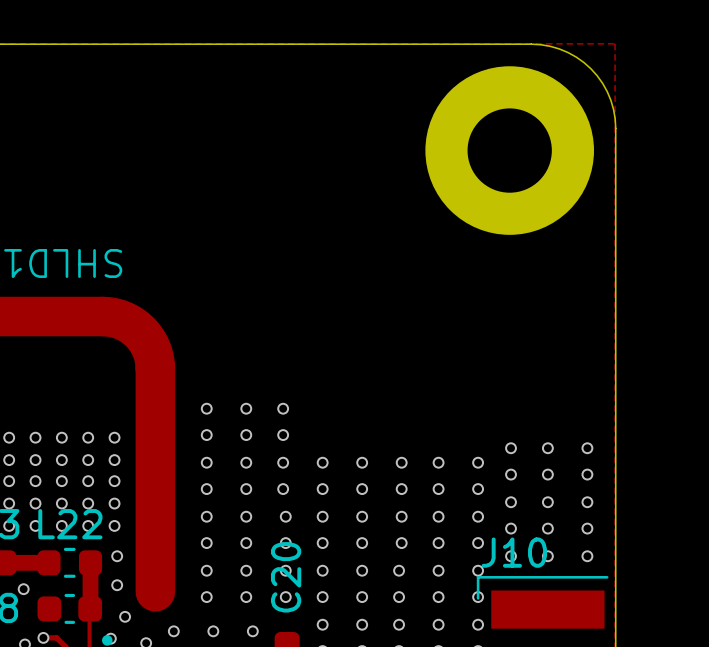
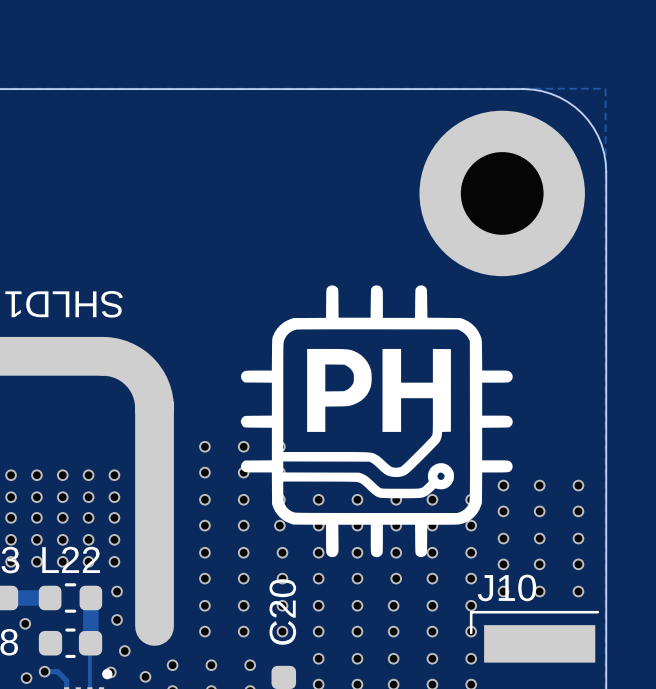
drawing: none -> [240, 285, 513, 558]

